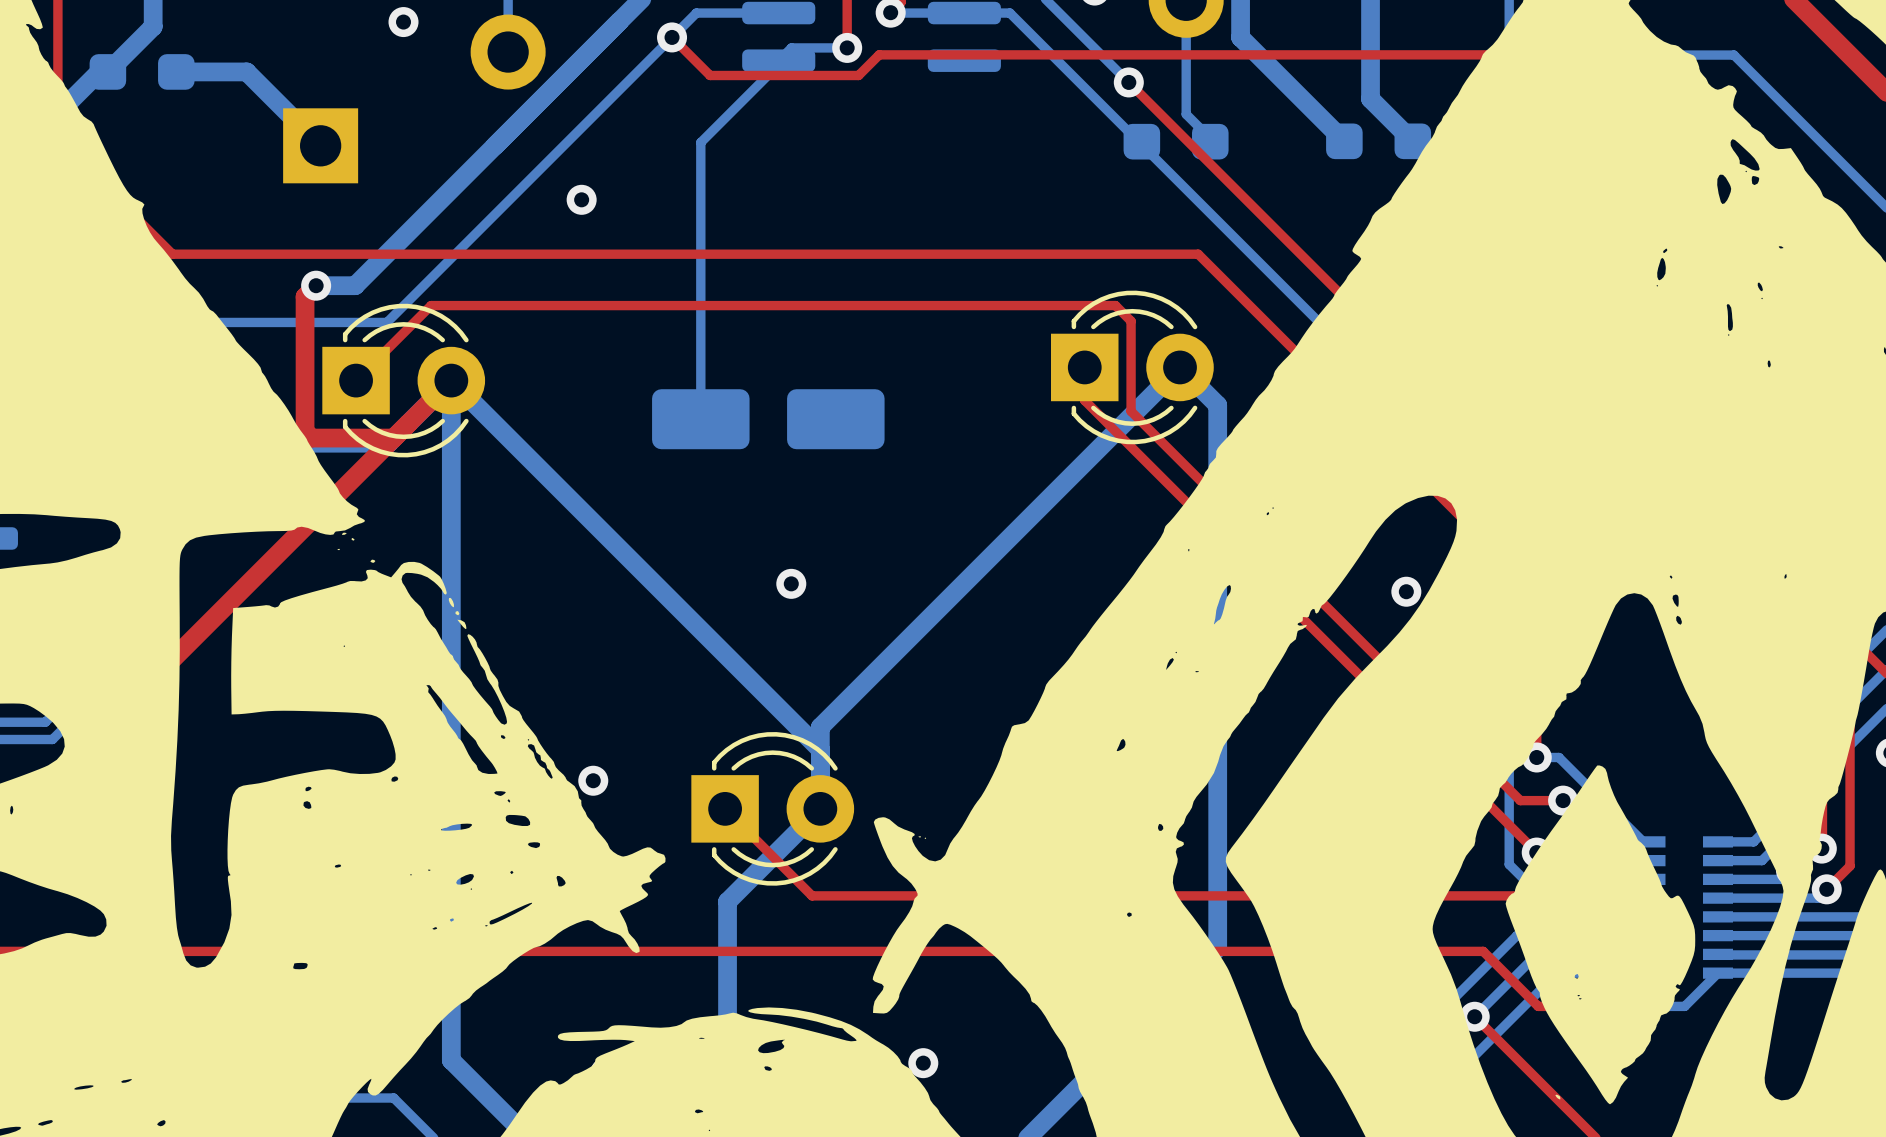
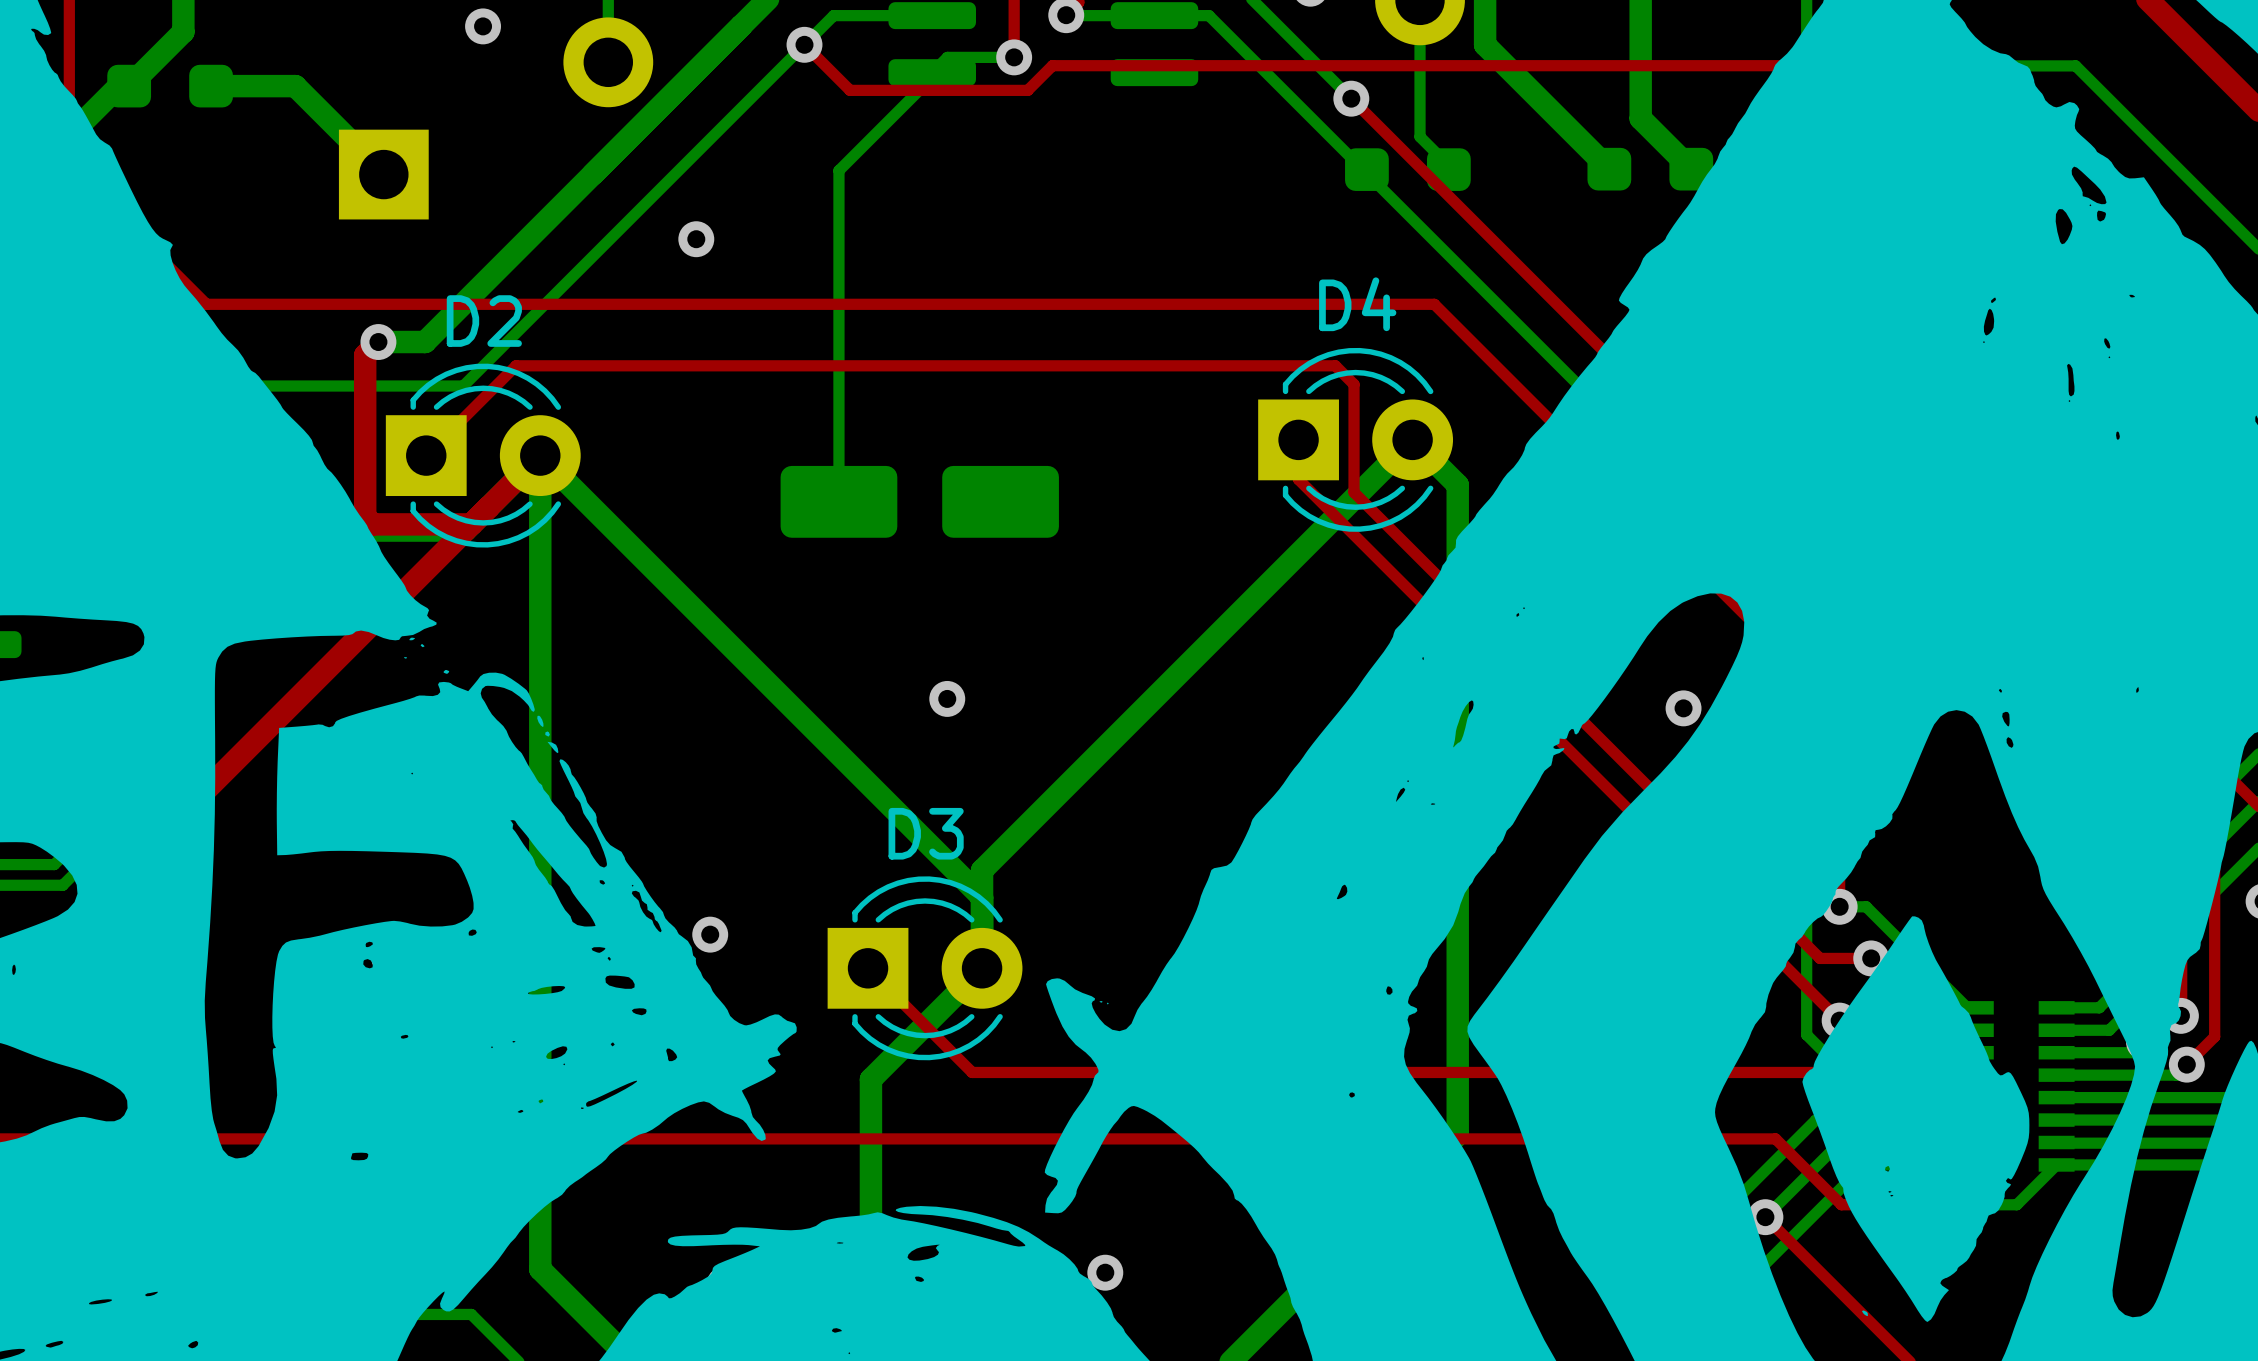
D4 name: none -> D4 (1357, 304)
D2 name: none -> D2 (484, 321)
D3 name: none -> D3 (926, 833)

